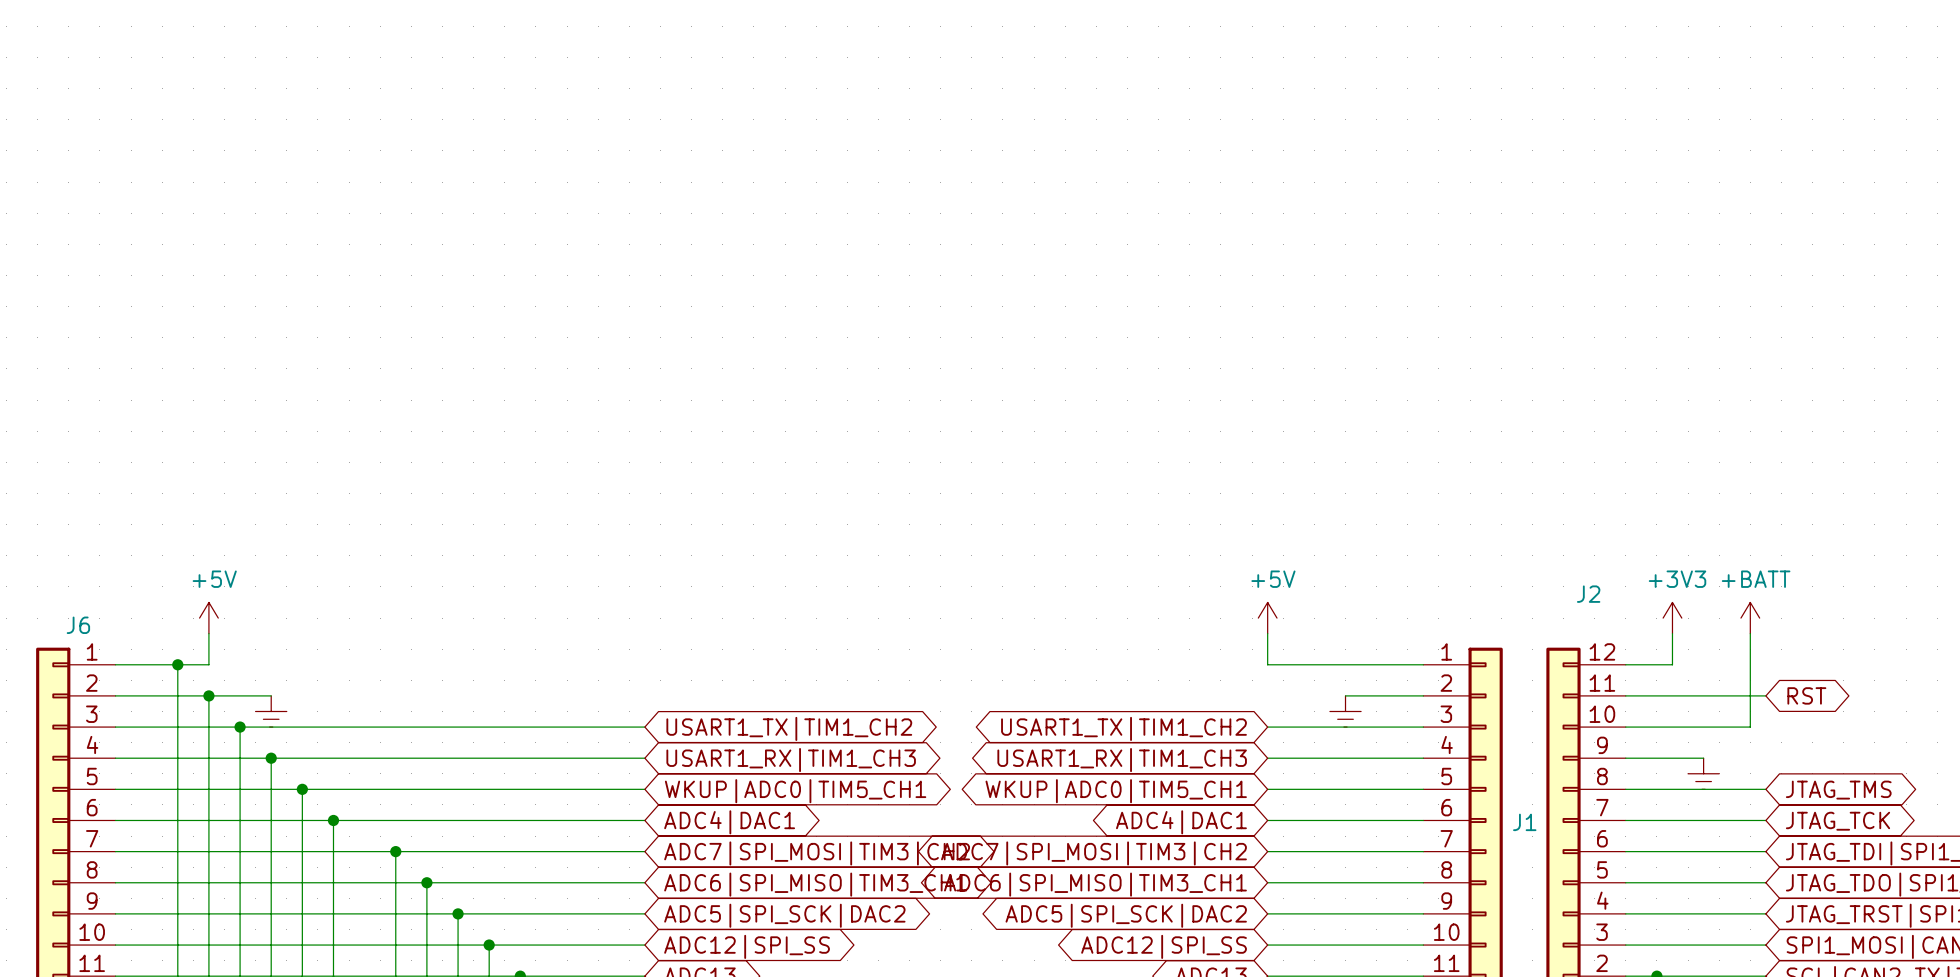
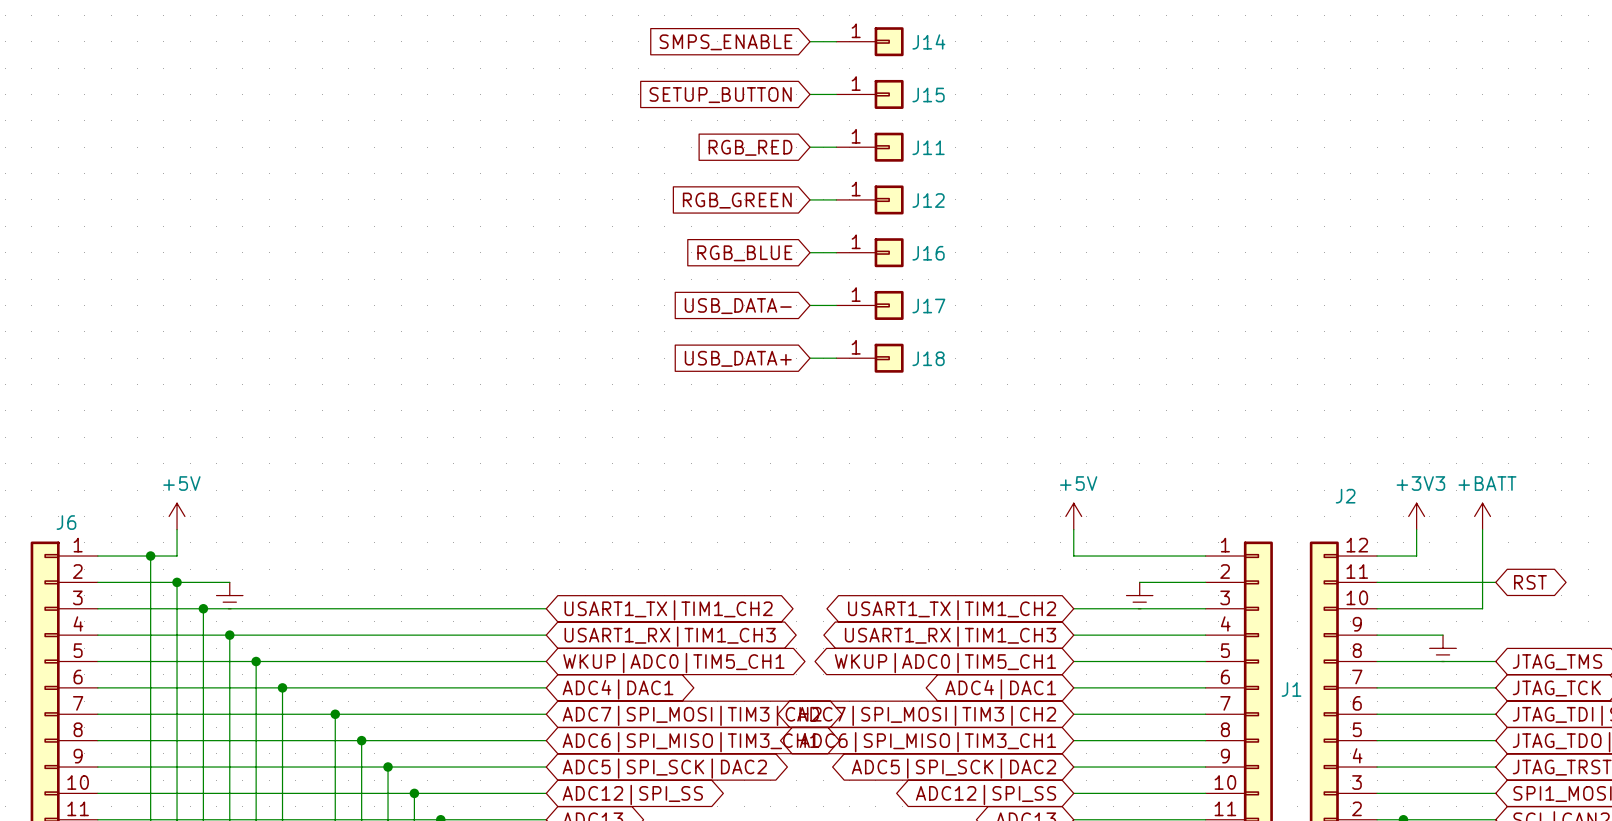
wire: none -> (810, 41) (836, 41)
J14: none -> (870, 41)
global label: none -> SMPS_ENABLE (726, 42)
wire: none -> (810, 94) (836, 94)
J15: none -> (870, 94)
global label: none -> SETUP_BUTTON (720, 95)
global label: none -> RGB_RED (750, 147)
wire: none -> (810, 147) (836, 147)
J11: none -> (870, 147)
wire: none -> (810, 199) (836, 199)
J12: none -> (870, 199)
global label: none -> RGB_GREEN (737, 200)
wire: none -> (810, 252) (836, 252)
J16: none -> (870, 252)
global label: none -> RGB_BLUE (744, 253)
wire: none -> (810, 305) (836, 305)
J17: none -> (870, 305)
global label: none -> USB_DATA- (738, 306)
global label: none -> USB_DATA+ (738, 358)
wire: none -> (810, 358) (836, 358)
J18: none -> (870, 358)

